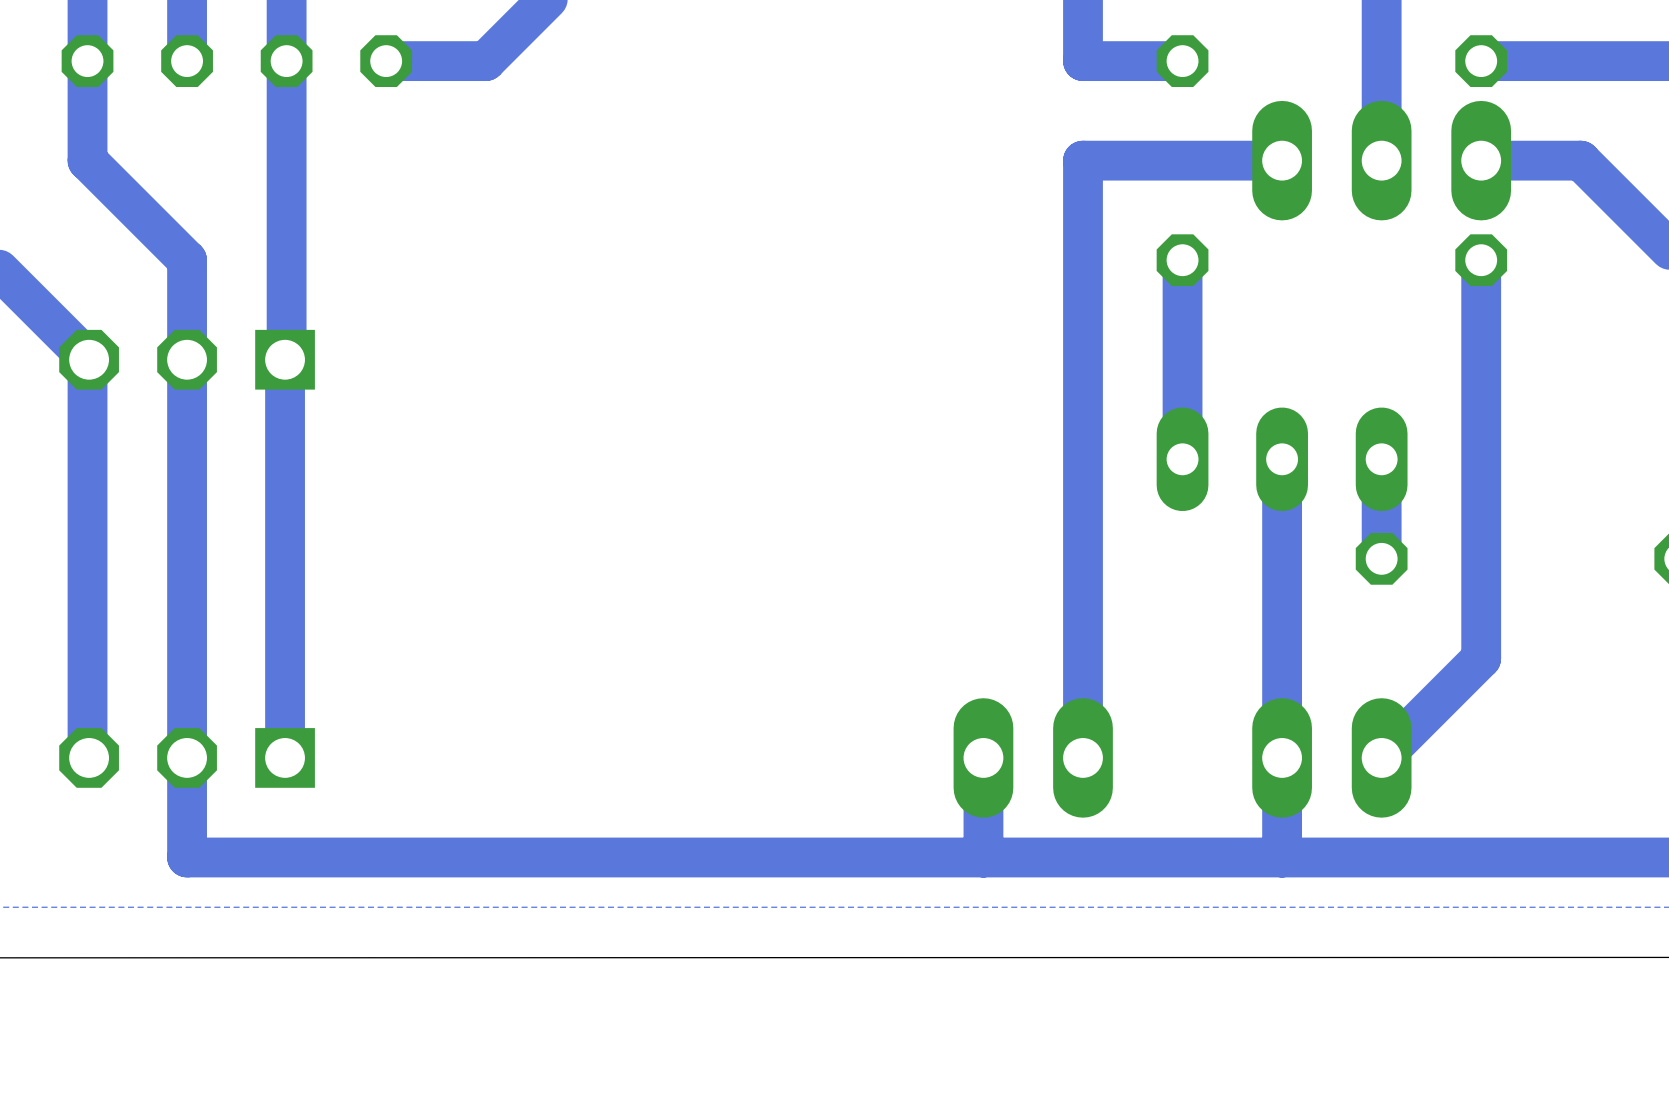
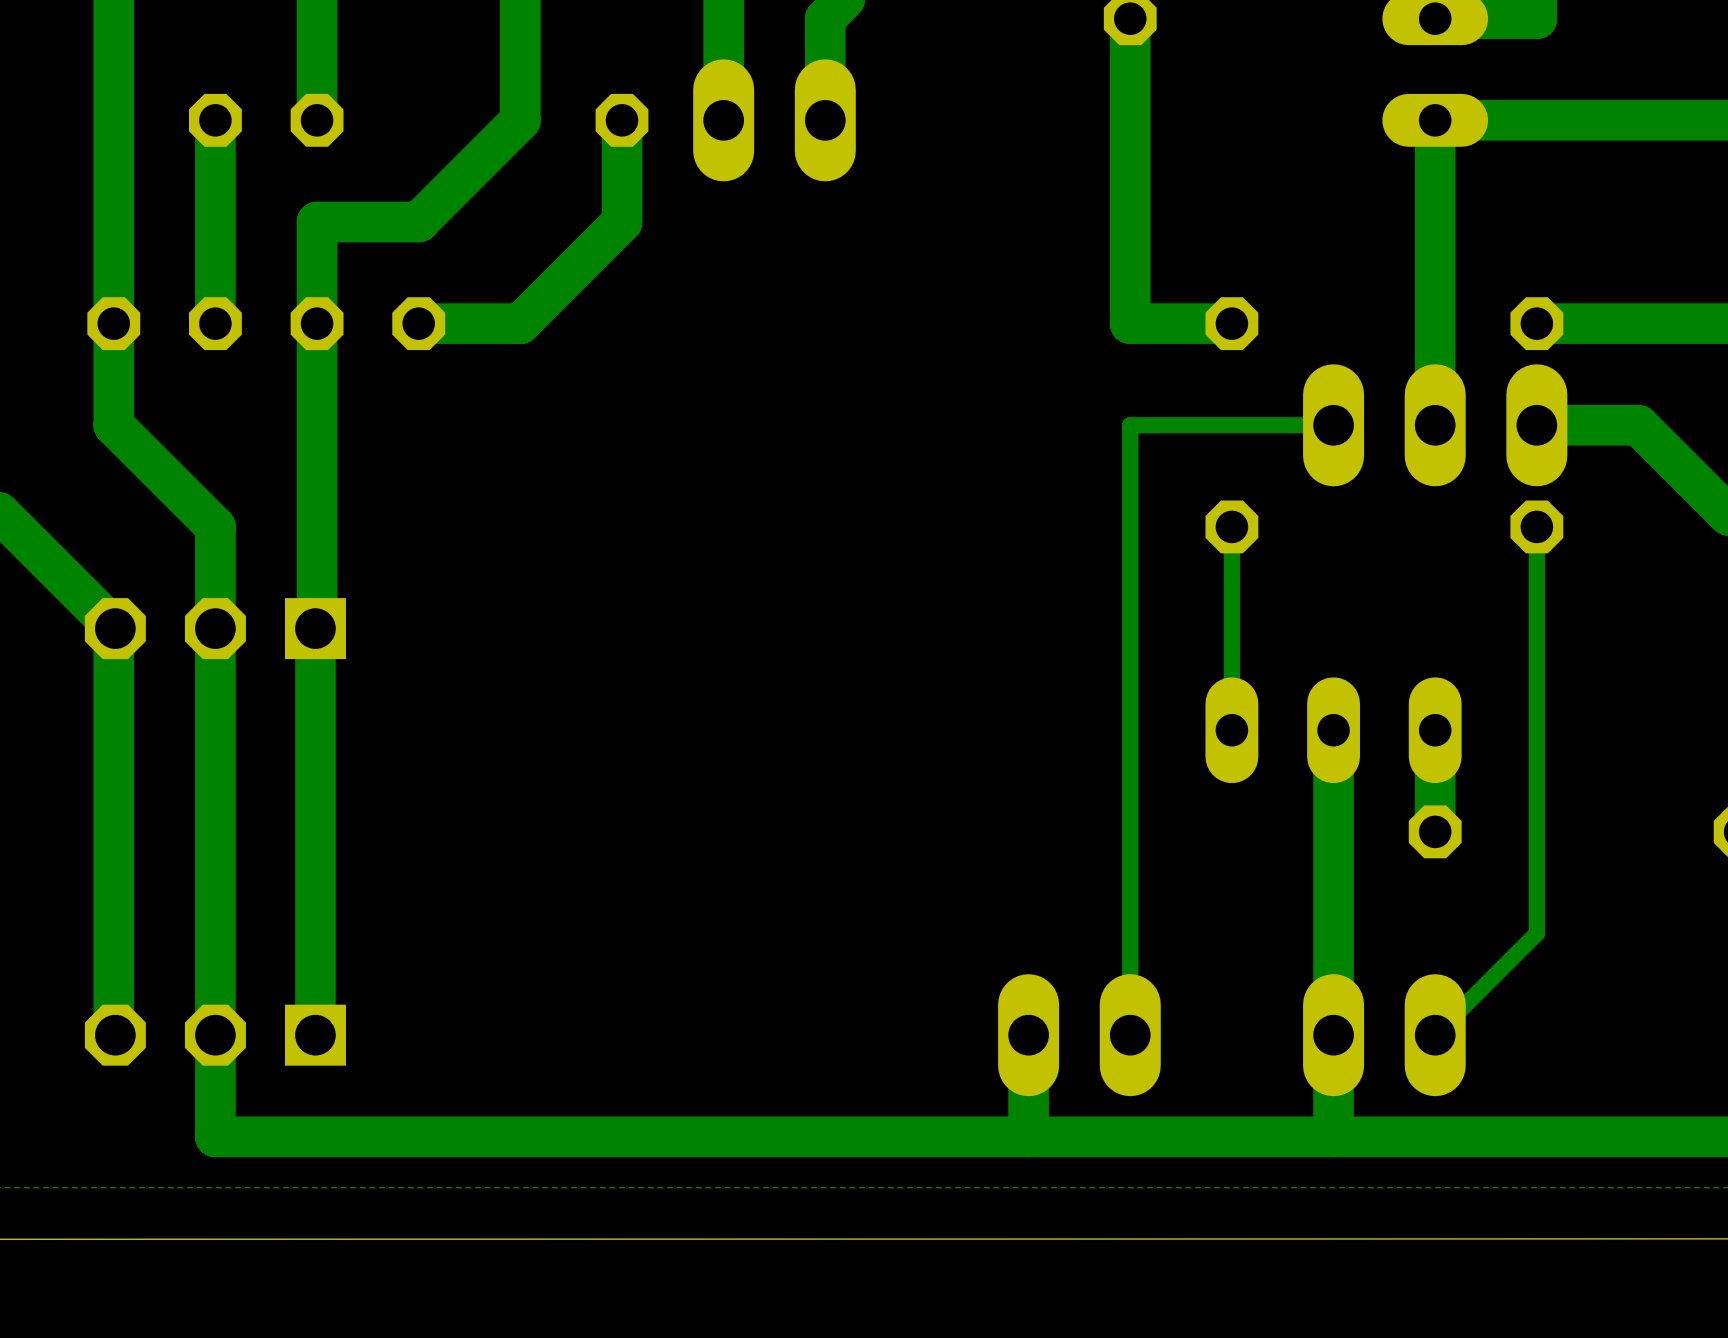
track width: thick (1282, 160) (1083, 160) (1083, 757) -> thin (1333, 425) (1130, 425) (1130, 1035)
track width: thick (1182, 260) (1182, 459) -> thin (1231, 526) (1231, 730)
track width: thick (1481, 260) (1481, 658) (1381, 757) -> thin (1536, 526) (1536, 933) (1435, 1035)

